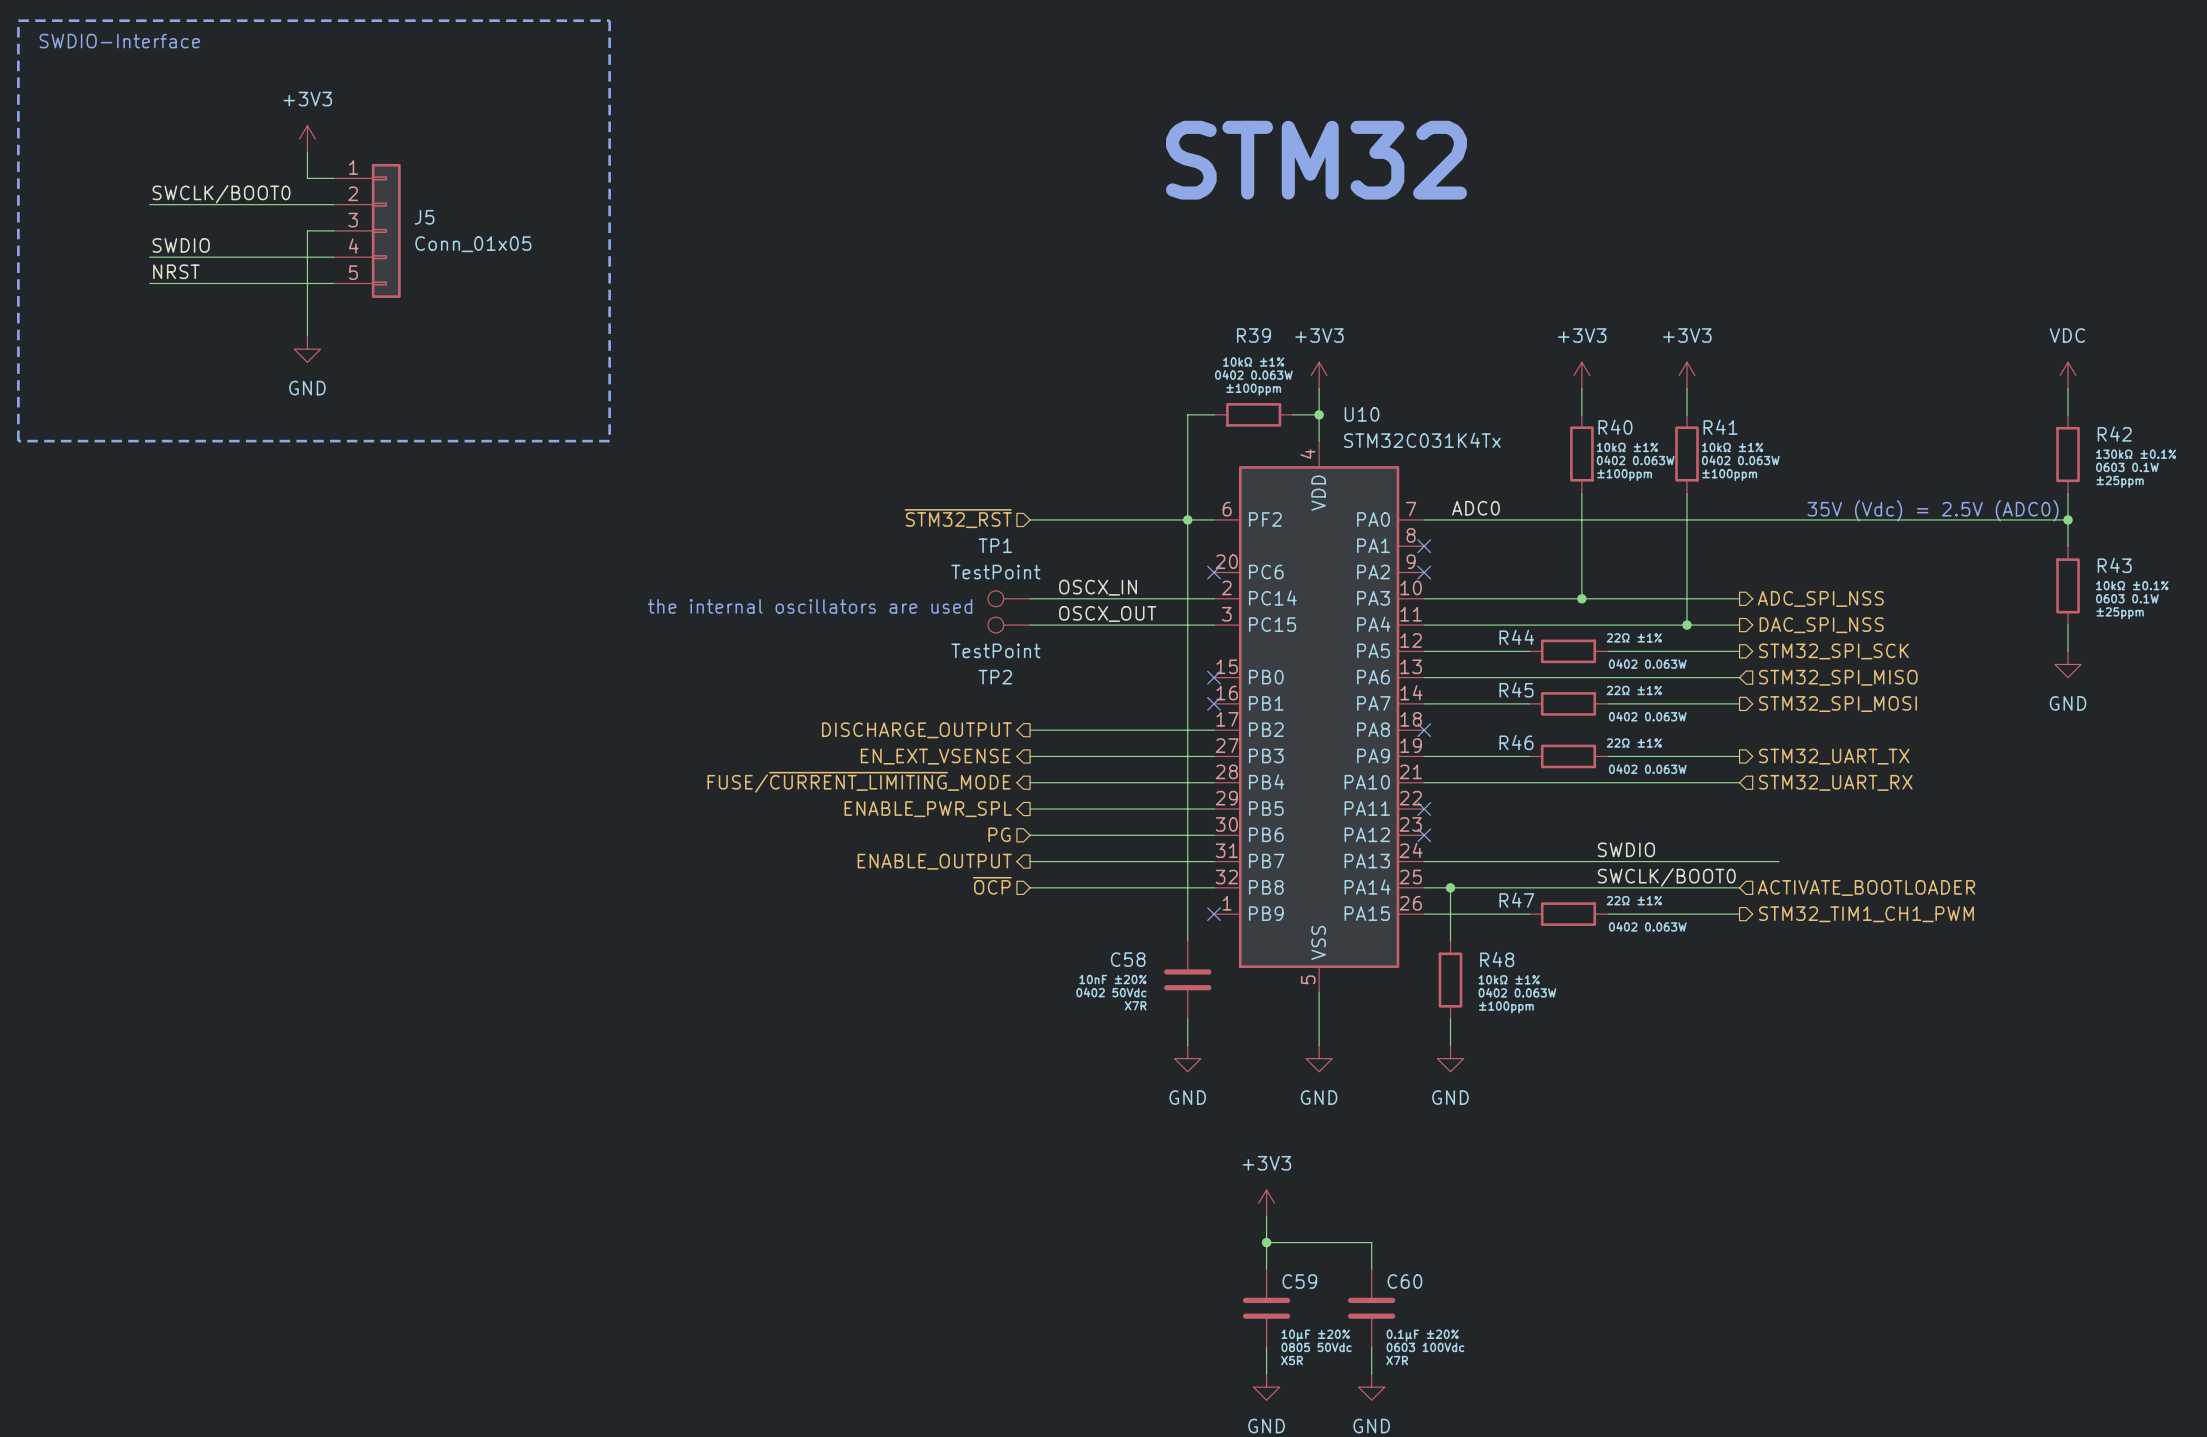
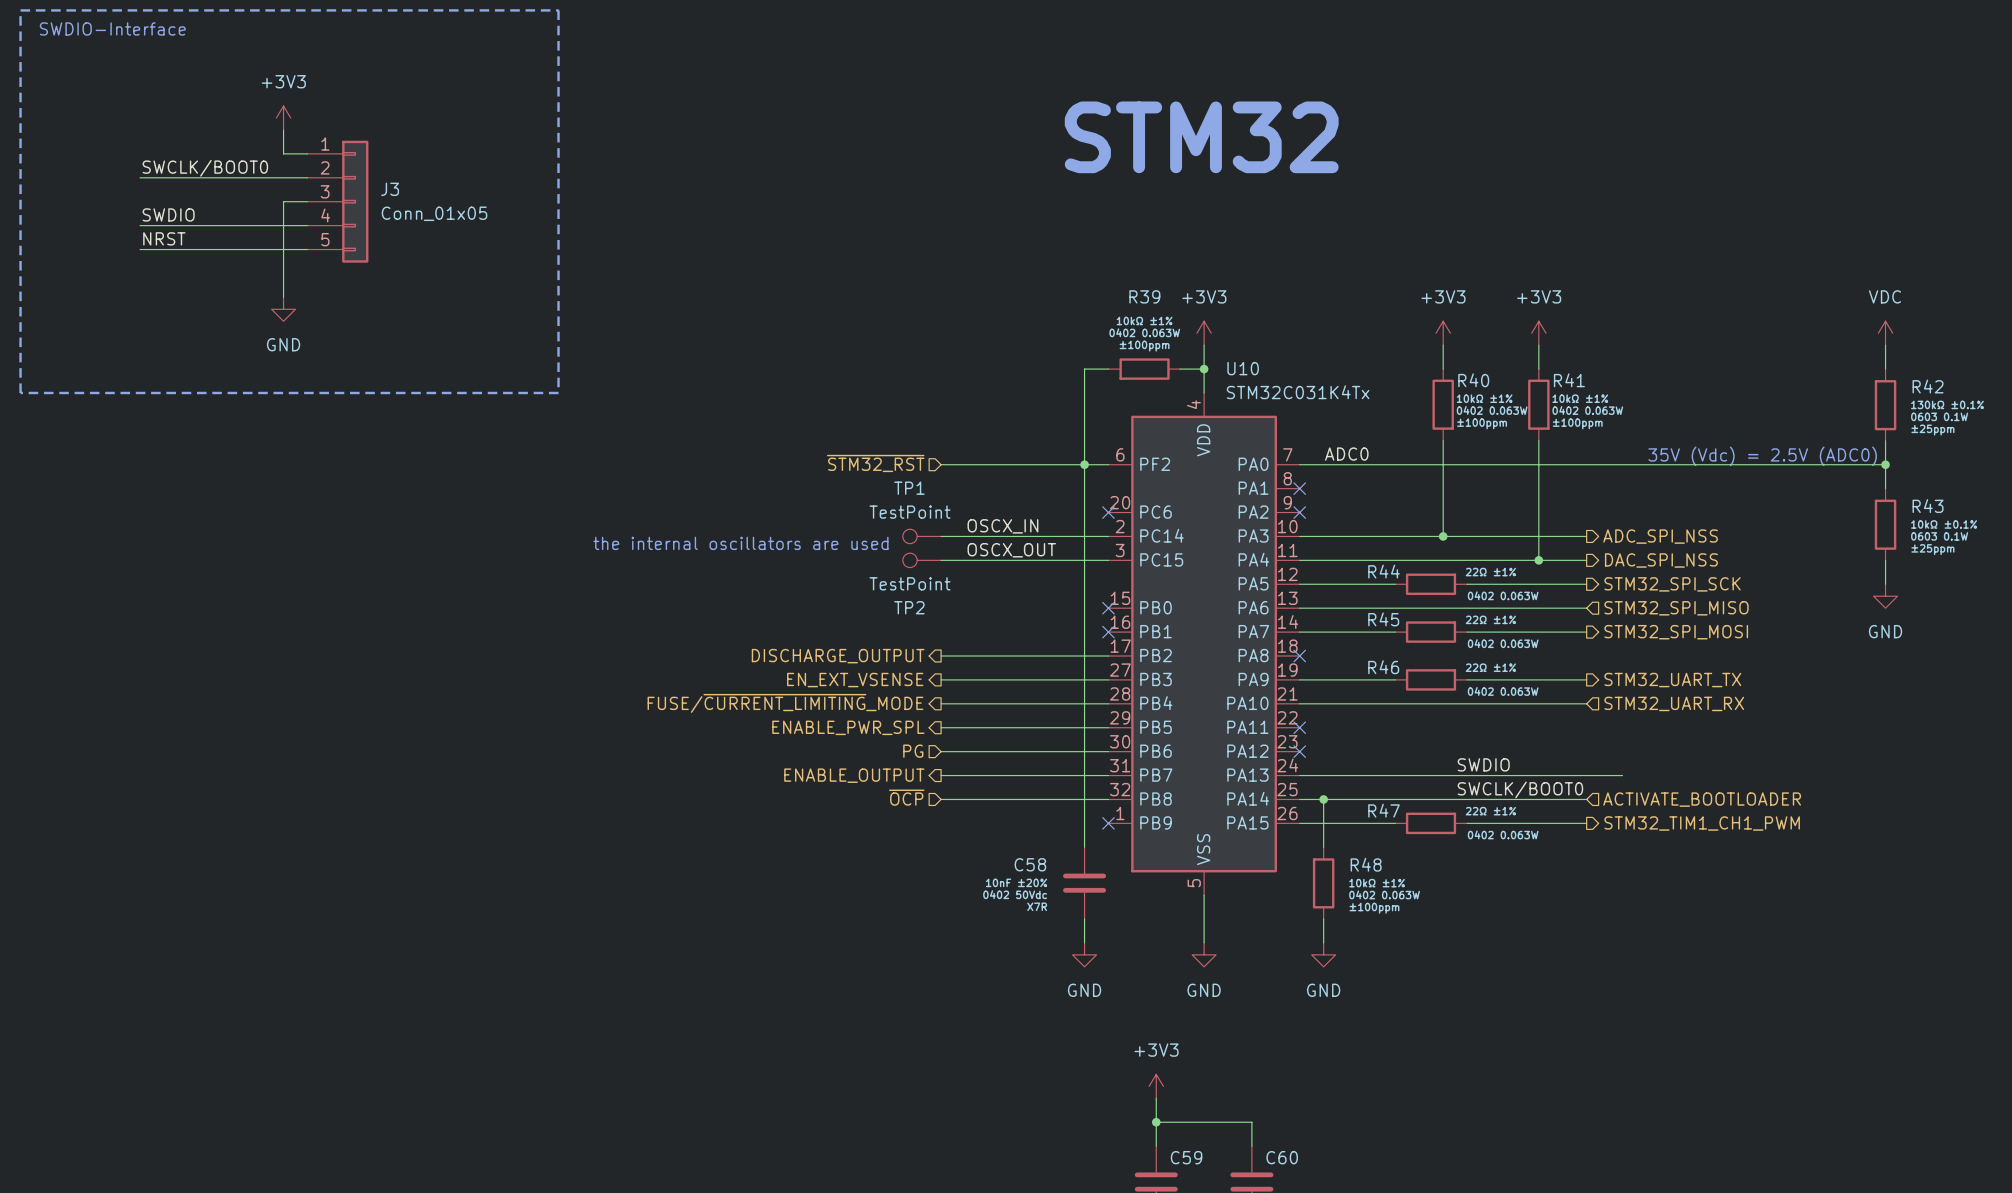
J5 name: J5 (424, 217) -> J3 (390, 189)

